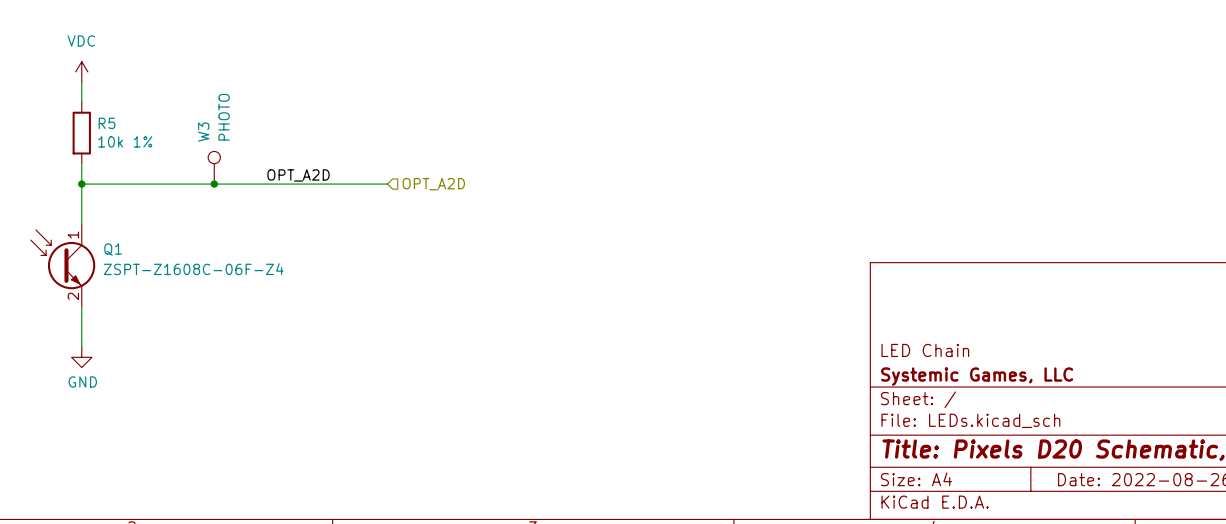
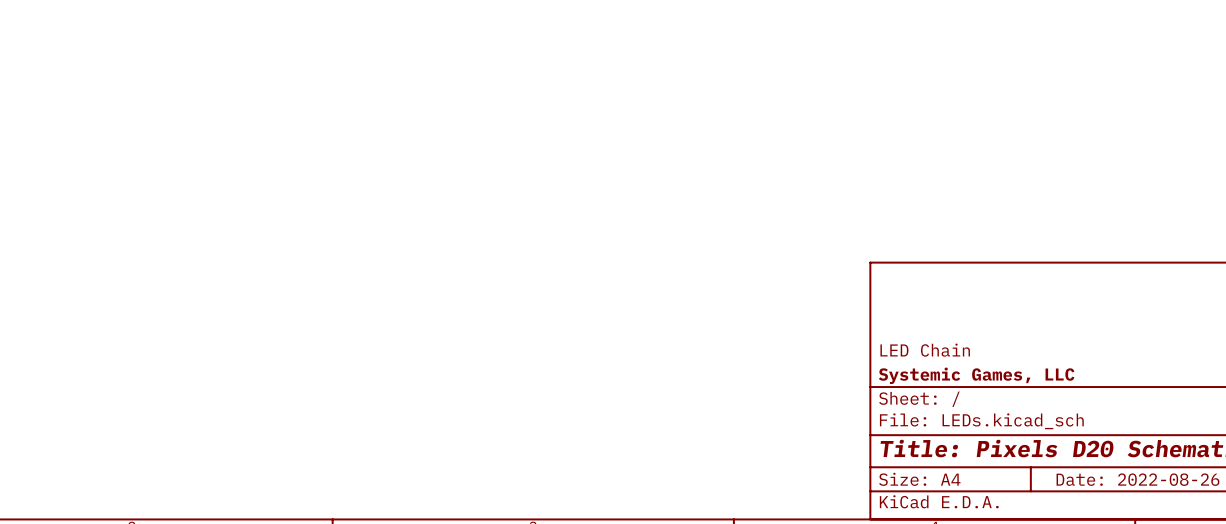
power symbol: VDC (81, 71) -> none
wire: (81, 82) (81, 102) -> none
R5: 10k 1% (81, 133) -> none
wire: (81, 163) (81, 224) -> none
W3: PHOTO (214, 167) -> none
label: OPT_A2D (298, 175) -> none
wire: (81, 184) (387, 184) -> none
junction: (81, 184) -> none
junction: (214, 184) -> none
hierarchical label: OPT_A2D (433, 184) -> none
Q1: ZSPT-Z1608C-06F-Z4 (63, 265) -> none
wire: (81, 306) (81, 347) -> none
power symbol: GND (81, 357) -> none

